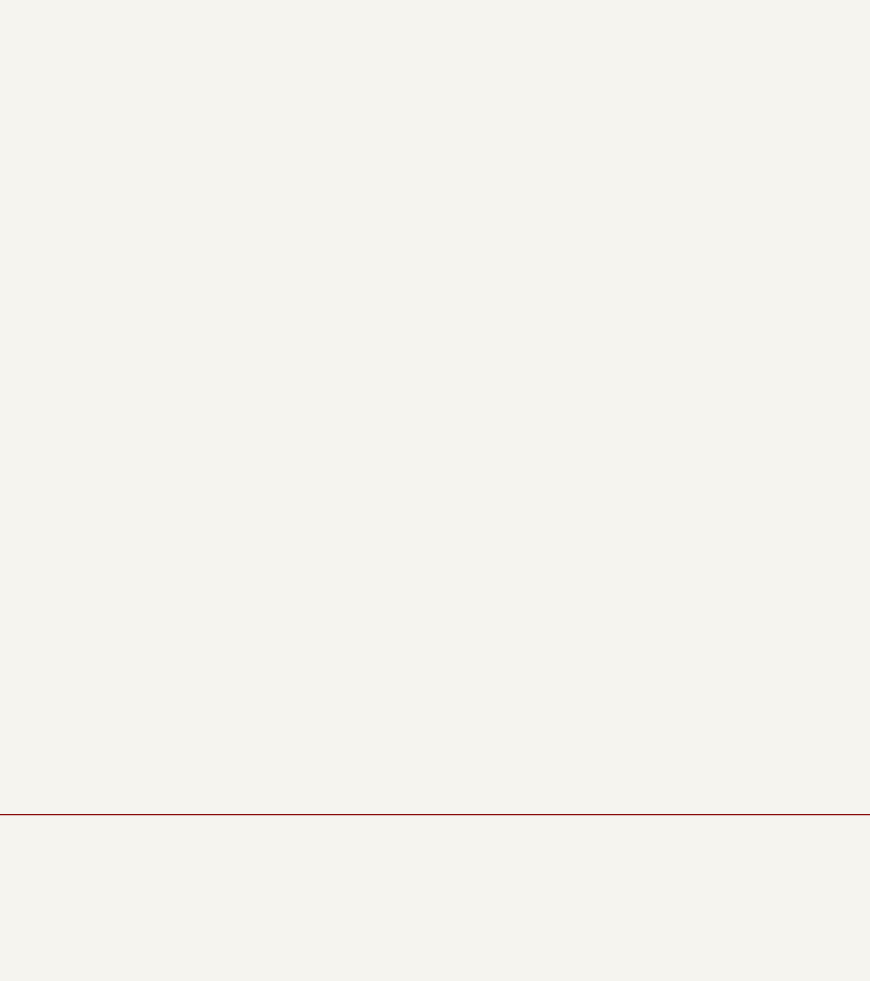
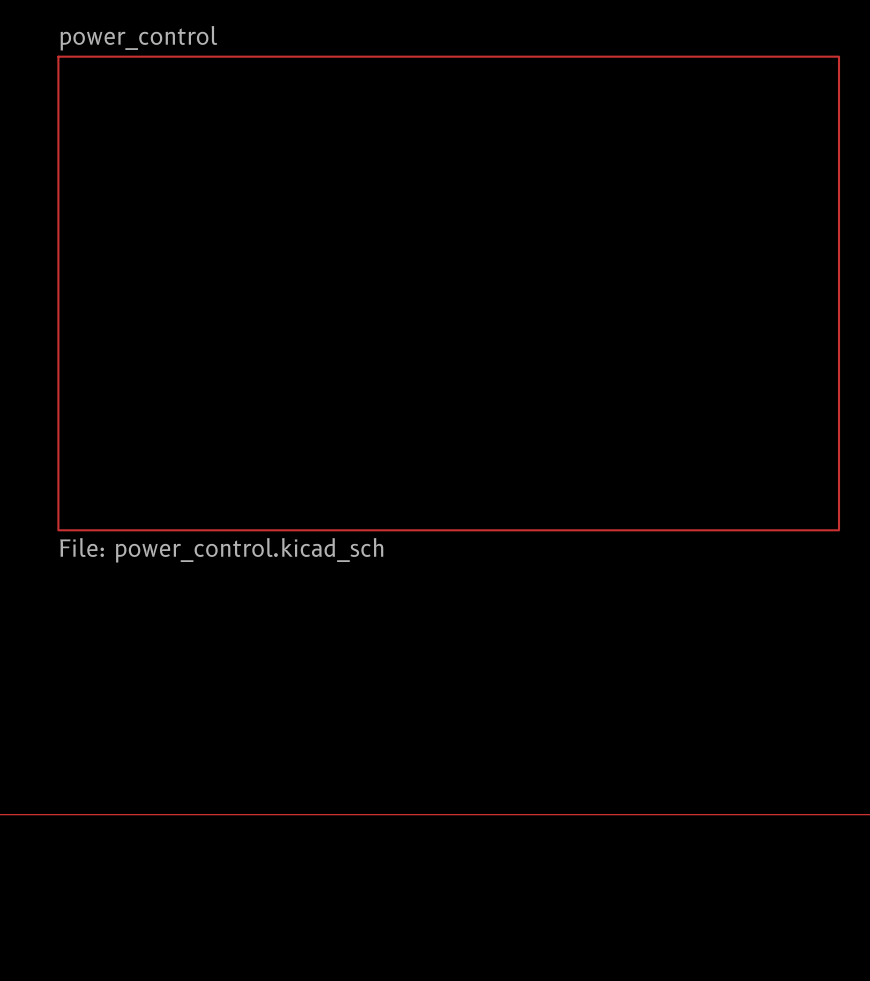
sheet power_control: none -> File: power_control.kicad_sch (448, 293)

